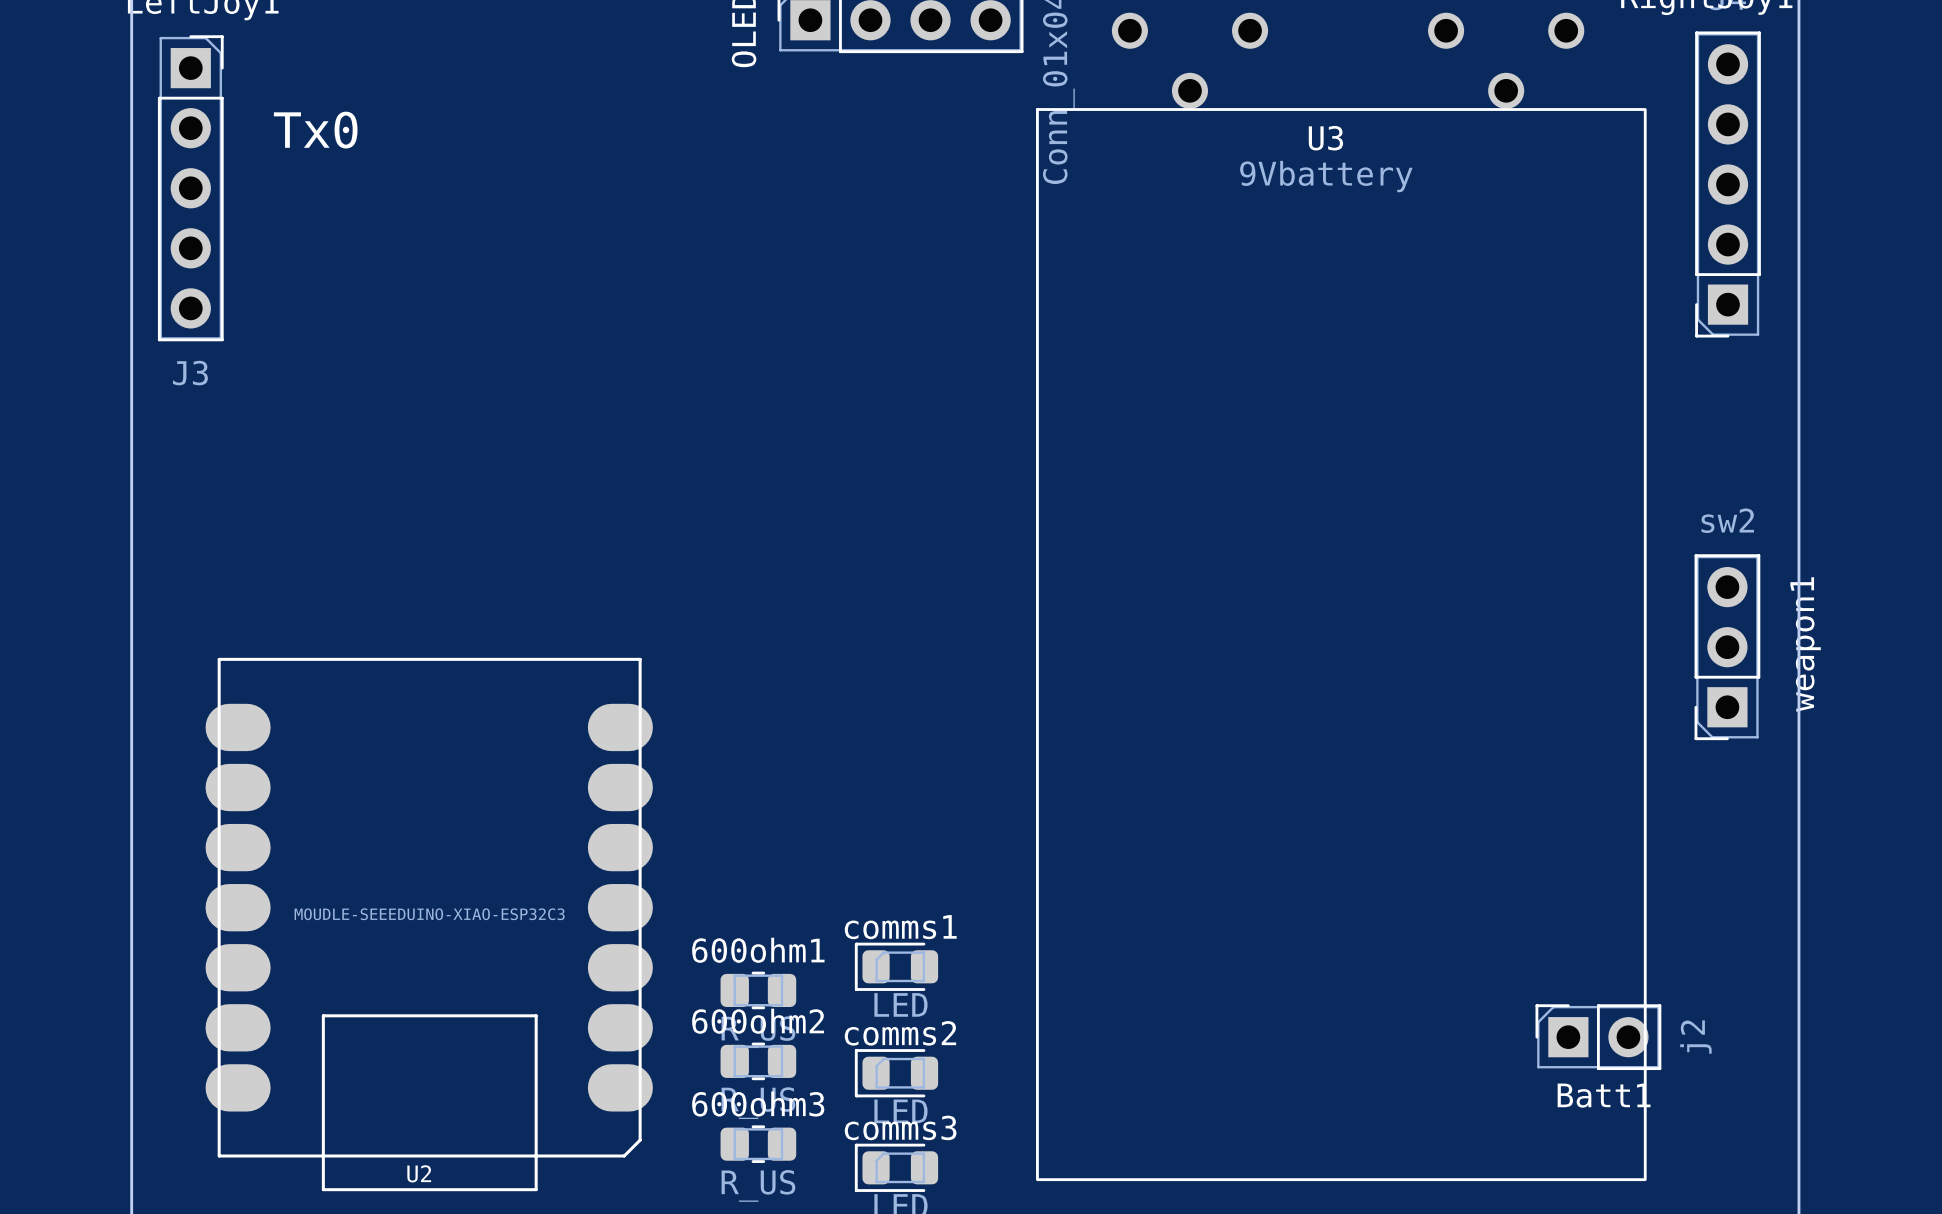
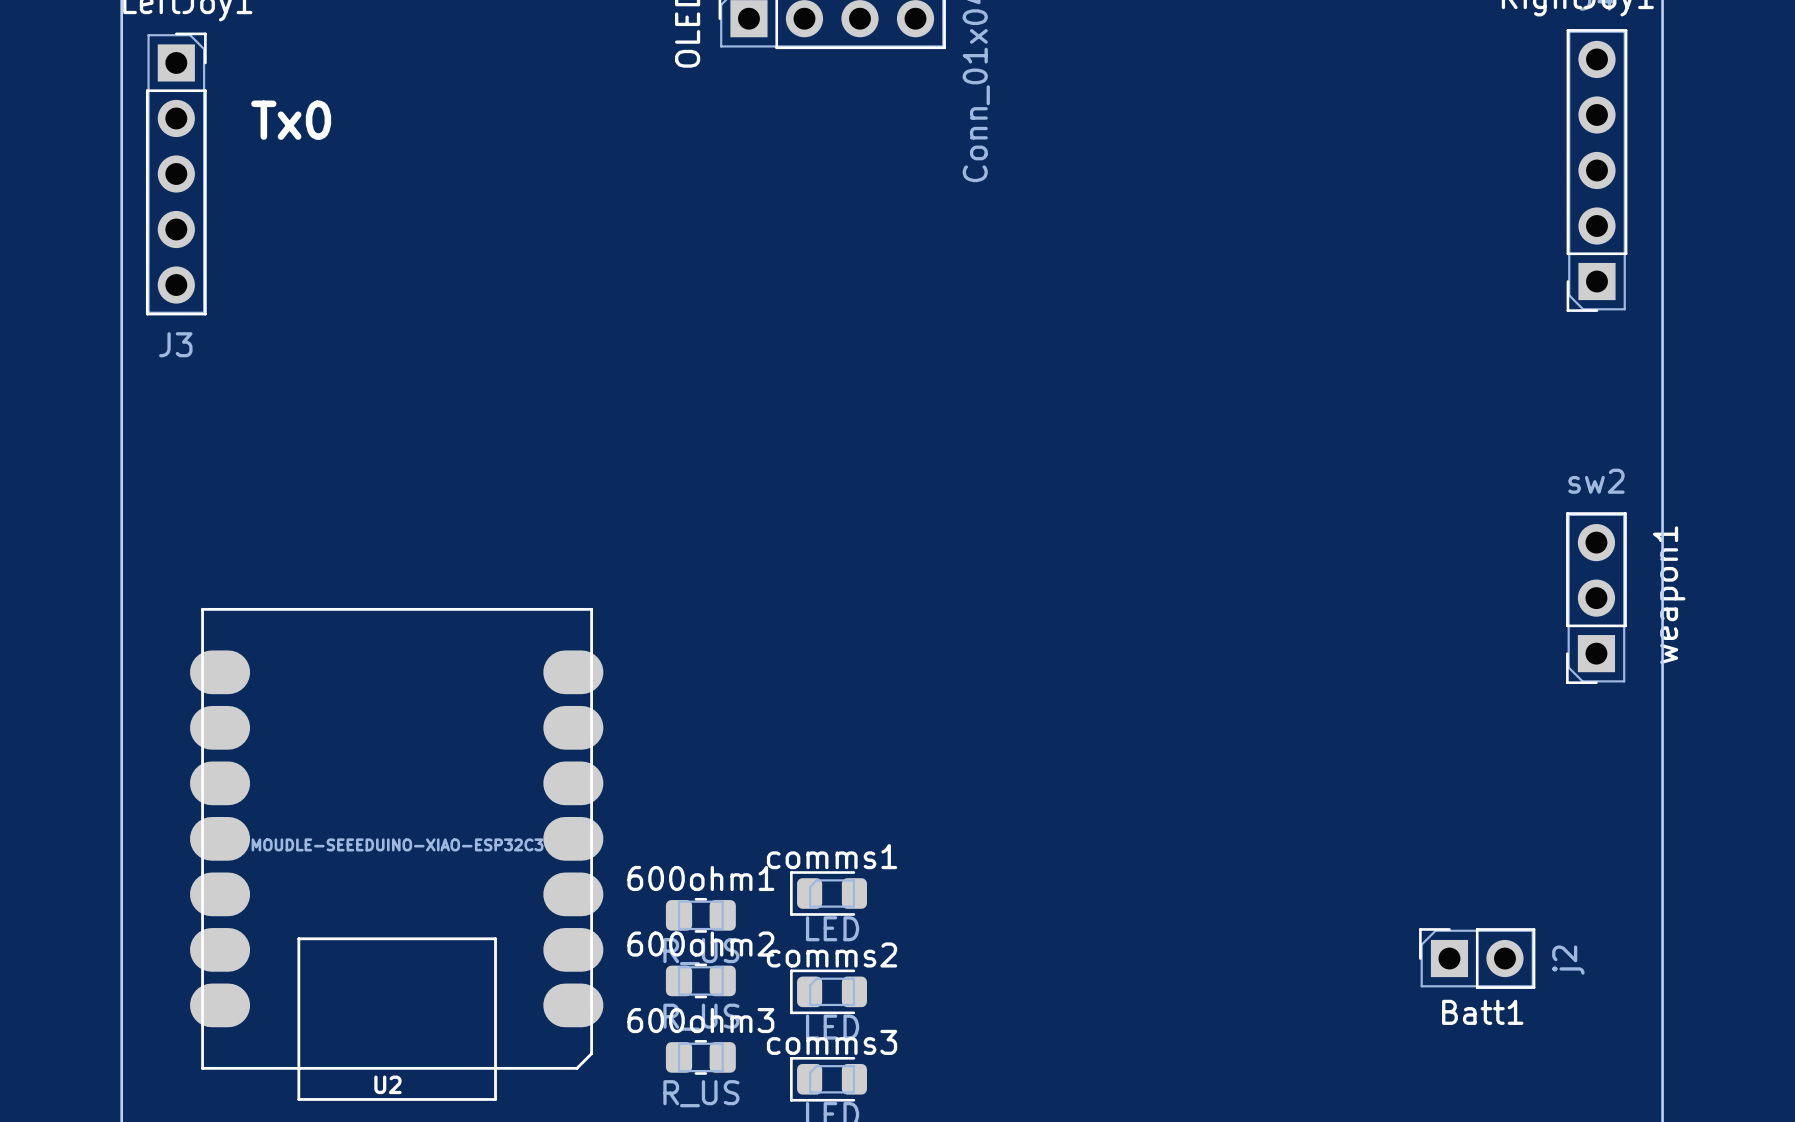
U3: 9Vbattery (1341, 596) -> none

